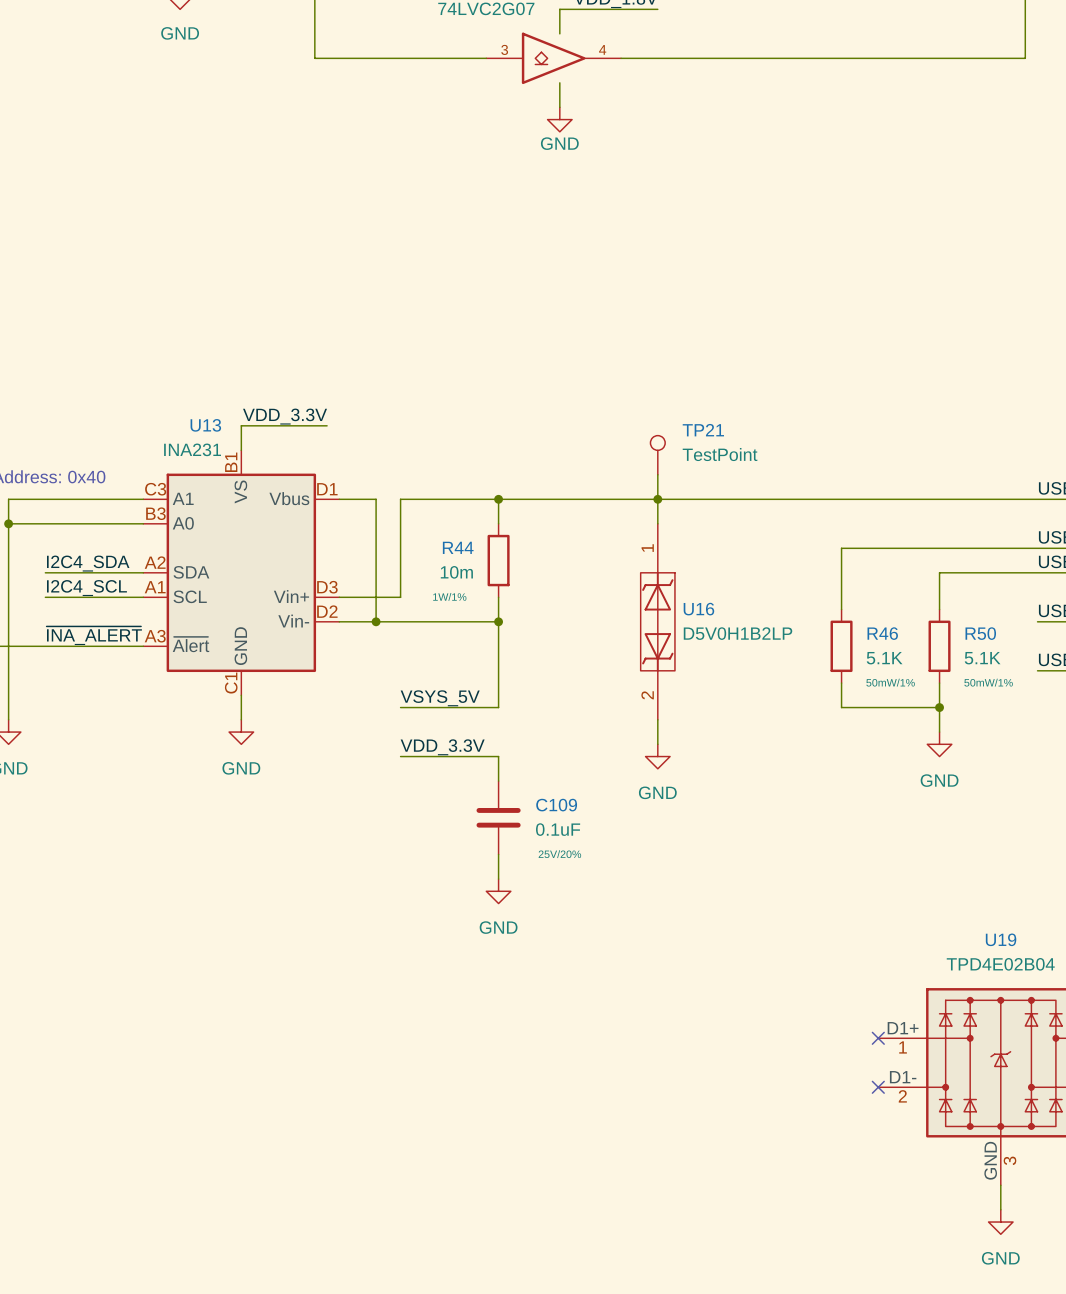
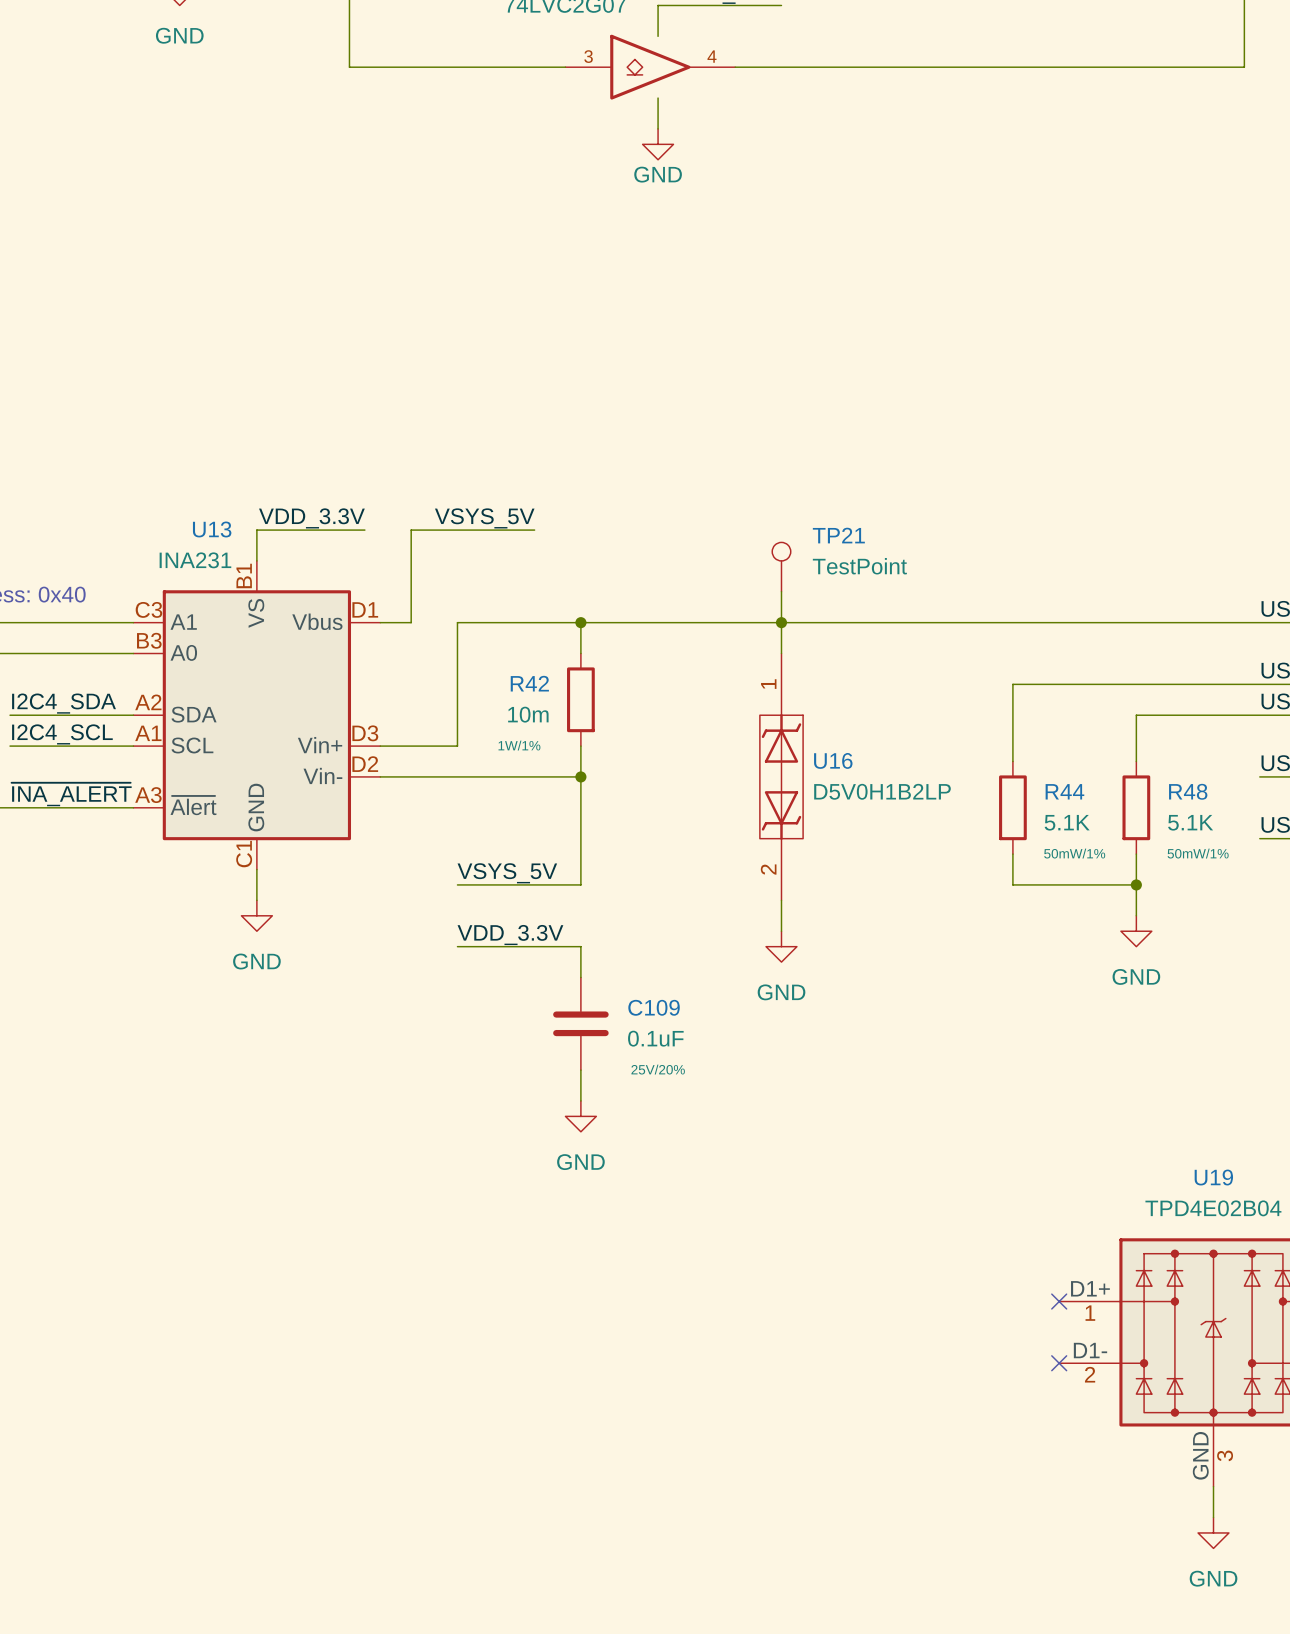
label: none -> VSYS_5V (484, 518)
wire: (363, 499) (376, 499) (376, 621) -> (411, 622) (411, 530) (534, 530)
R44 name: R44 (458, 547) -> R42 (529, 683)
junction: (376, 621) -> none
R46 name: R46 (882, 633) -> R44 (1064, 791)
R50 name: R50 (980, 633) -> R48 (1188, 791)

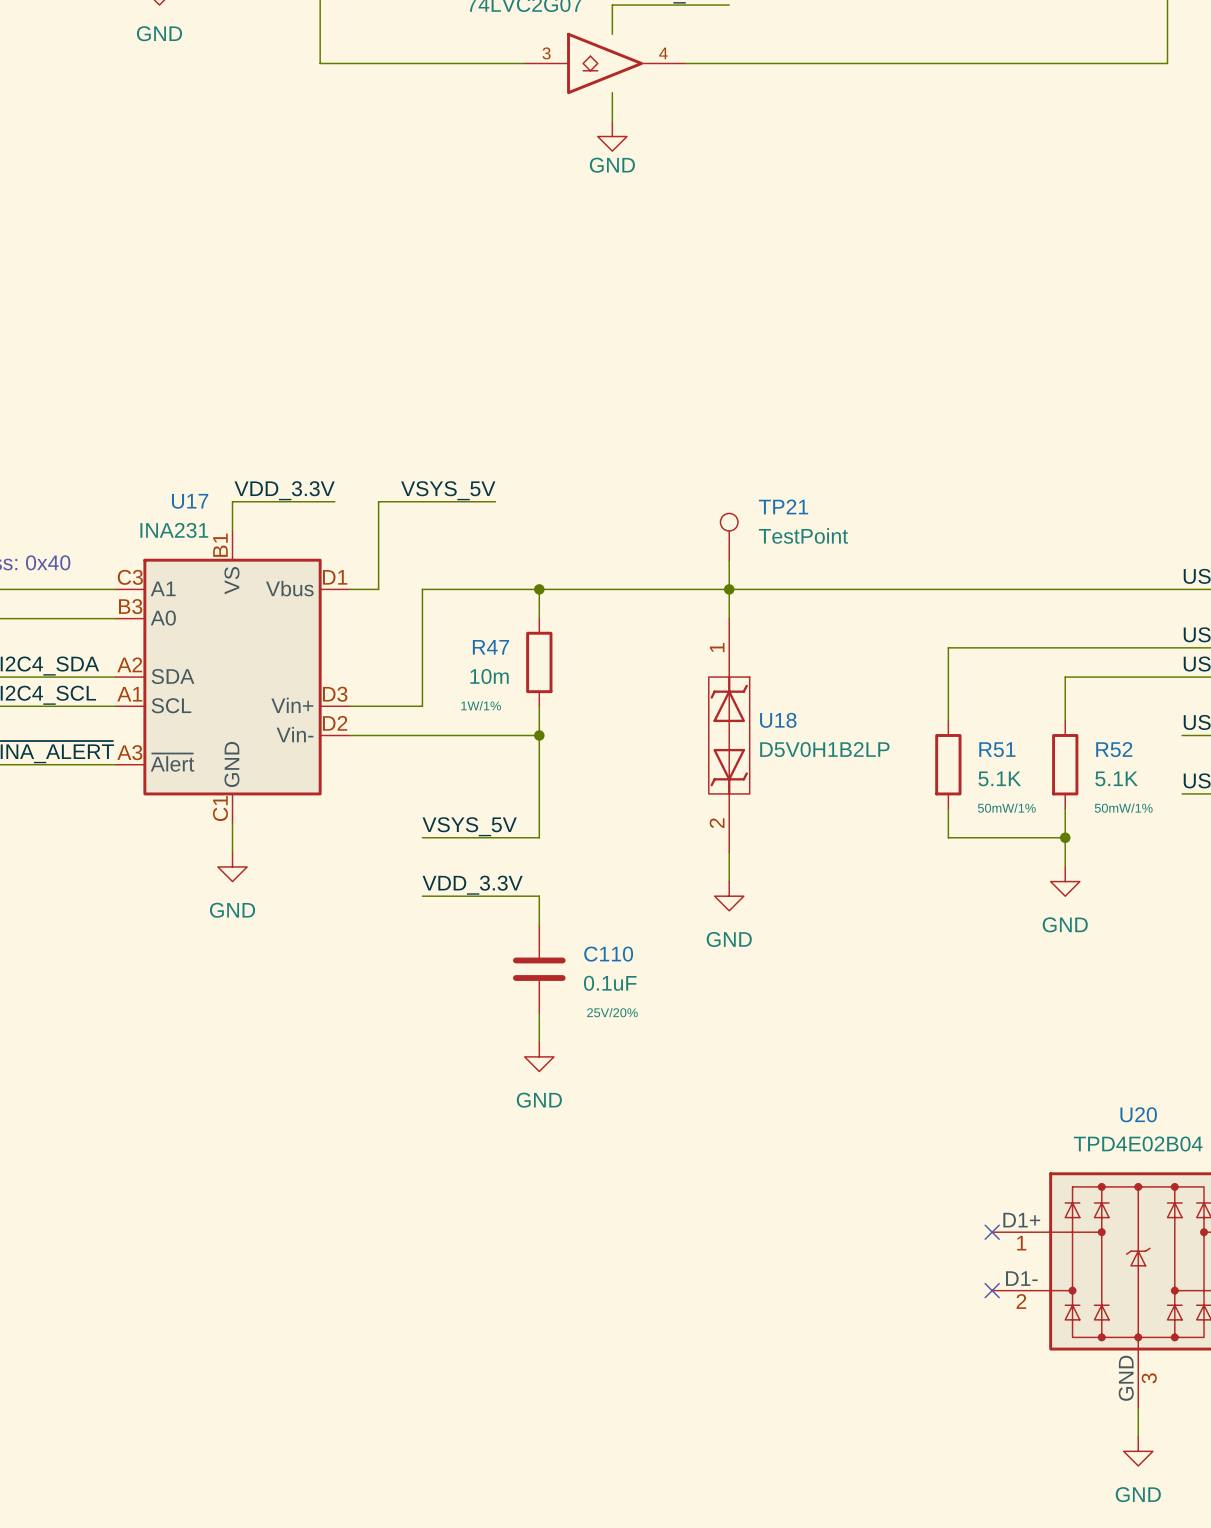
U13 name: U13 (212, 529) -> U17 (190, 501)
R42 name: R42 (529, 683) -> R47 (490, 647)
U16 name: U16 (833, 760) -> U18 (778, 720)
R44 name: R44 (1064, 791) -> R51 (997, 749)
R48 name: R48 (1188, 791) -> R52 (1114, 749)
C109 name: C109 (654, 1007) -> C110 (608, 954)
U19 name: U19 (1213, 1177) -> U20 (1138, 1114)

